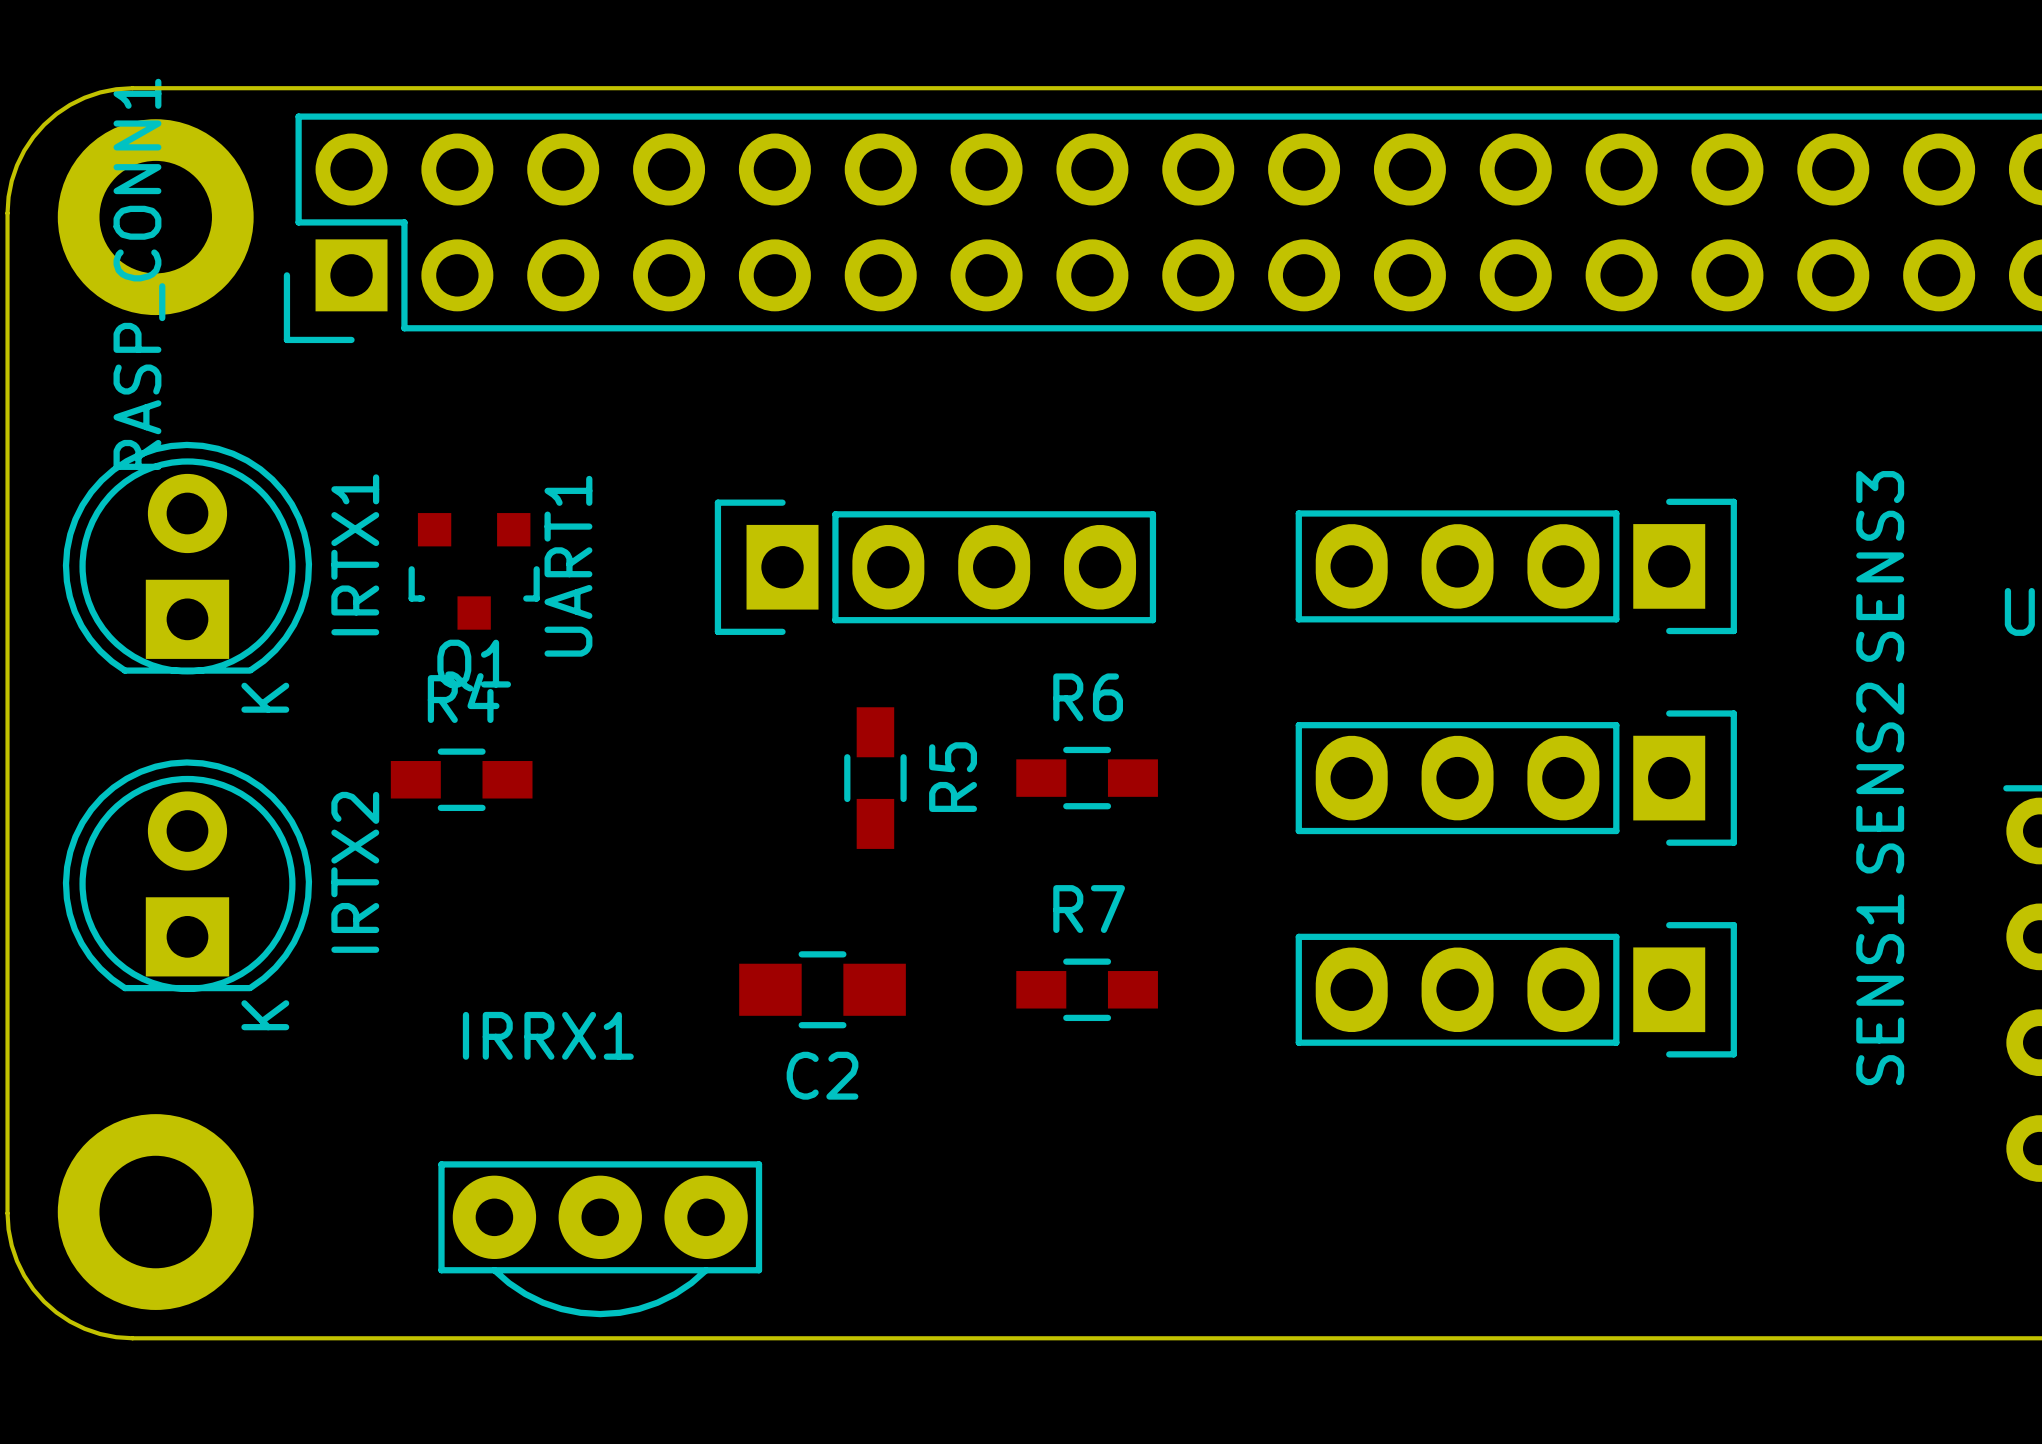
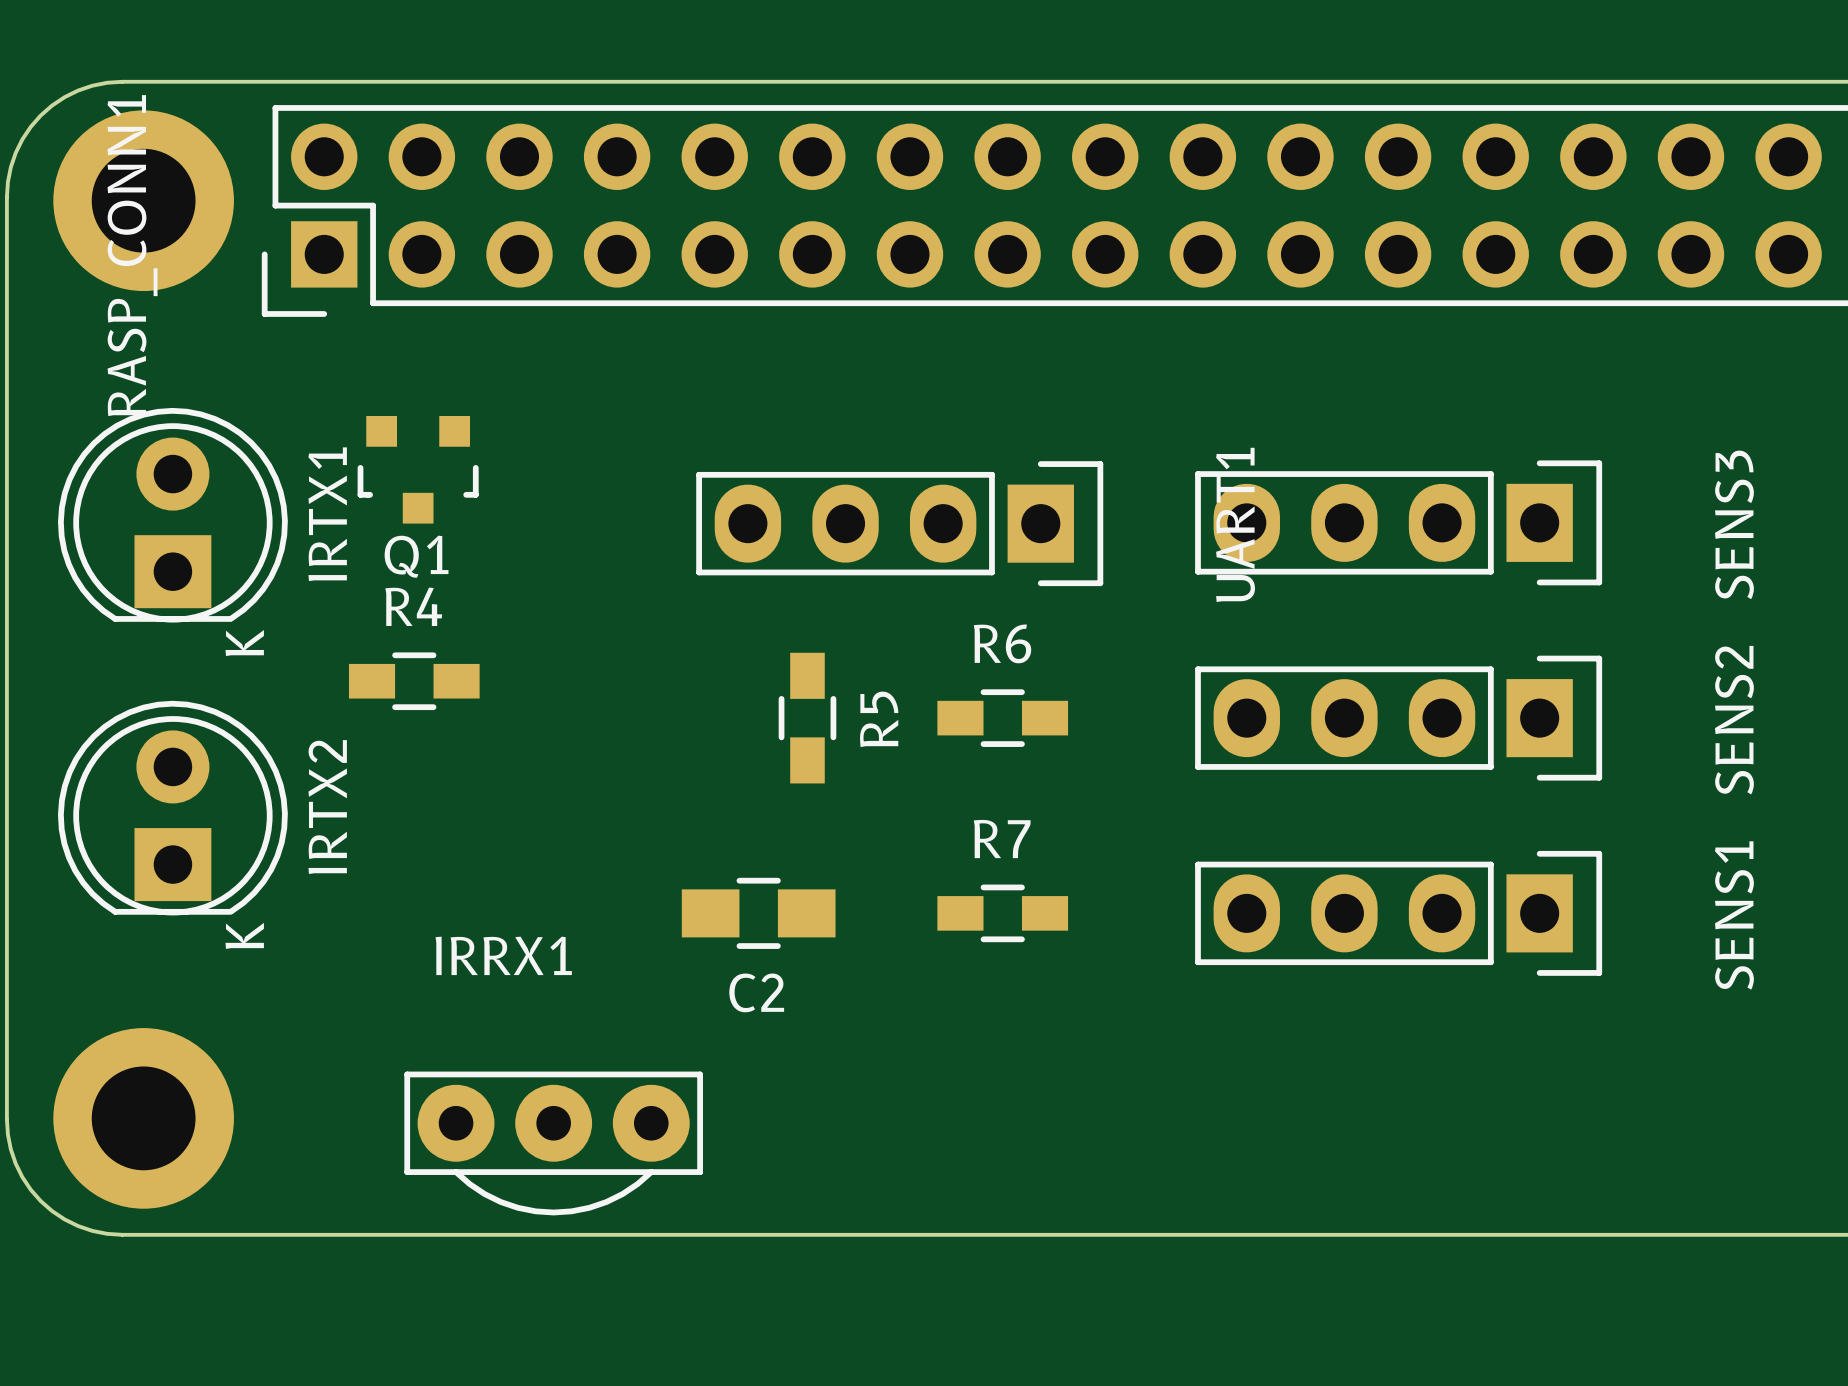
UART1 rotation: 0° (935, 567) -> 180° (899, 523)
Q1 position: (474, 571) -> (418, 469)
R4 position: (461, 779) -> (414, 681)

